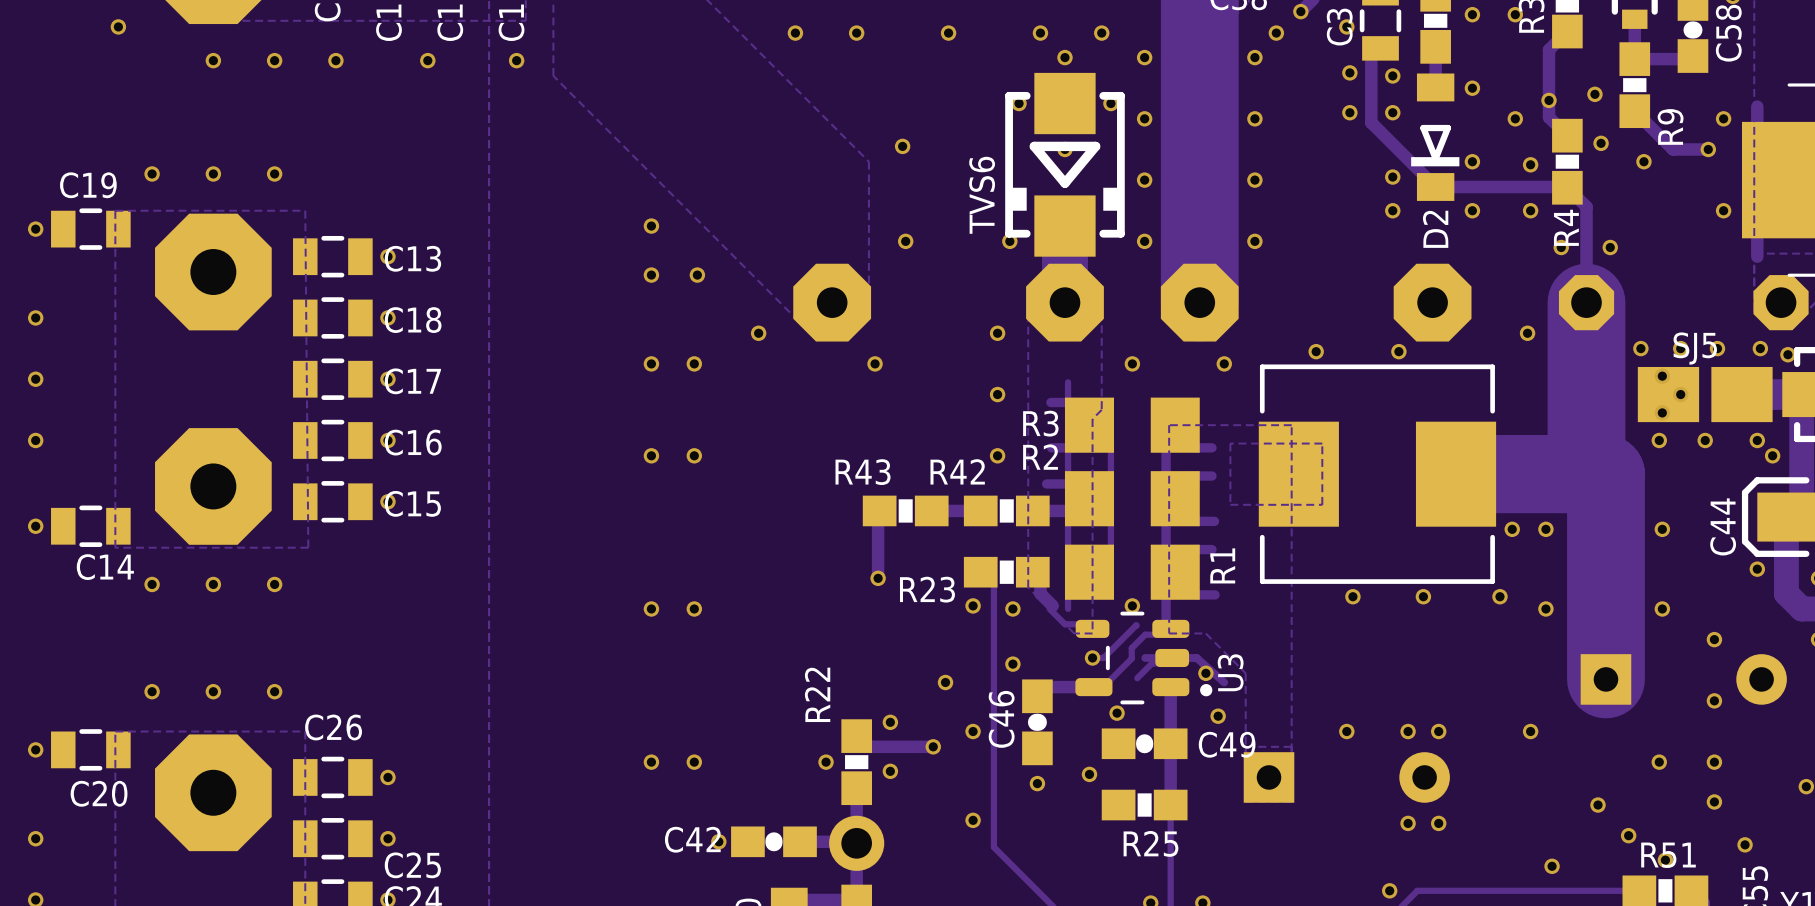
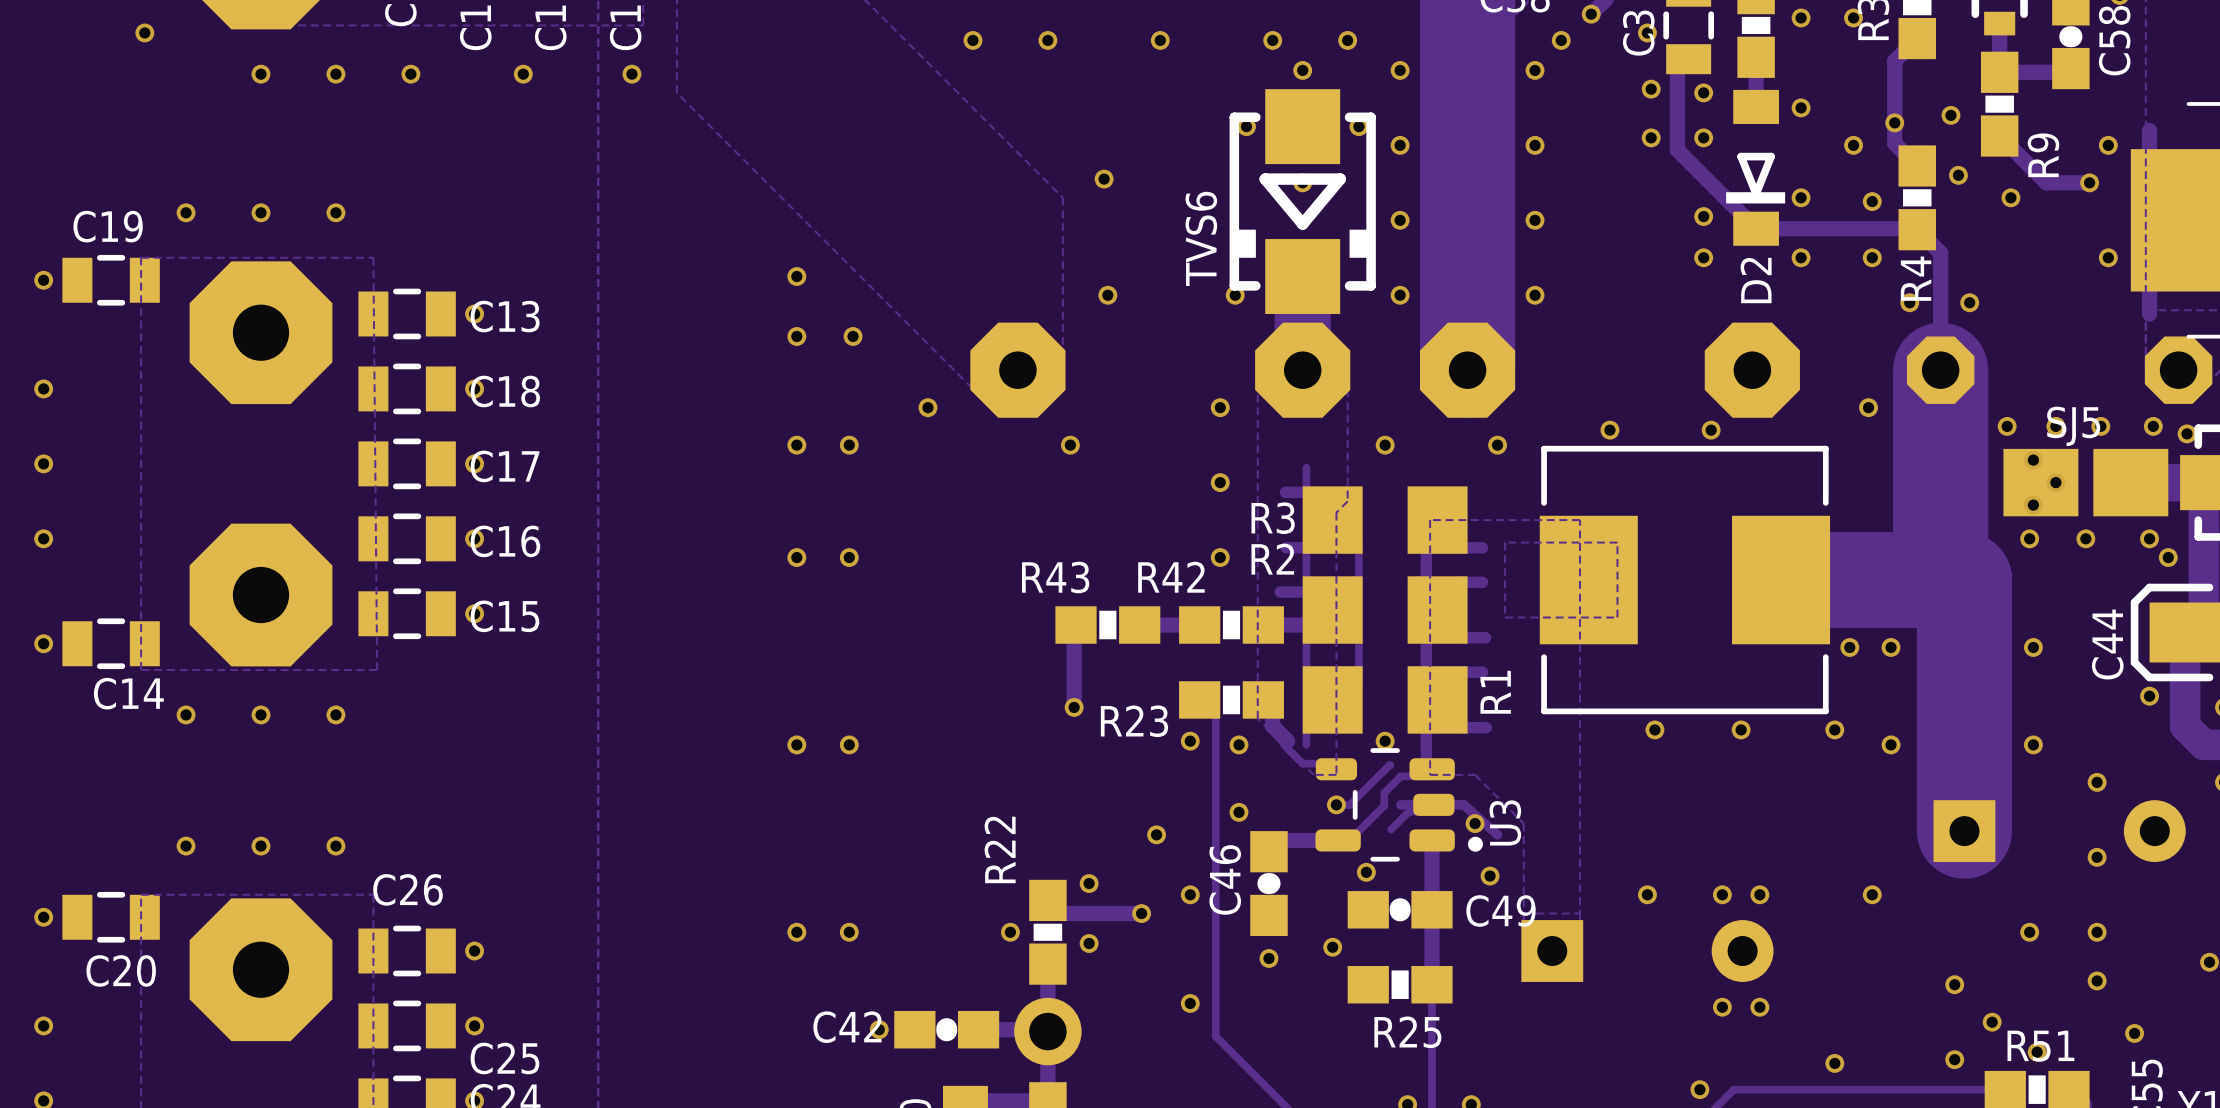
via: (1552, 866) -> none
via: none -> (1954, 1059)
via: none -> (1834, 1063)

